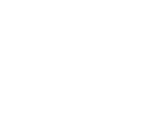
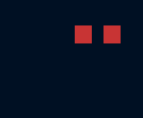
part: none -> (97, 34)

